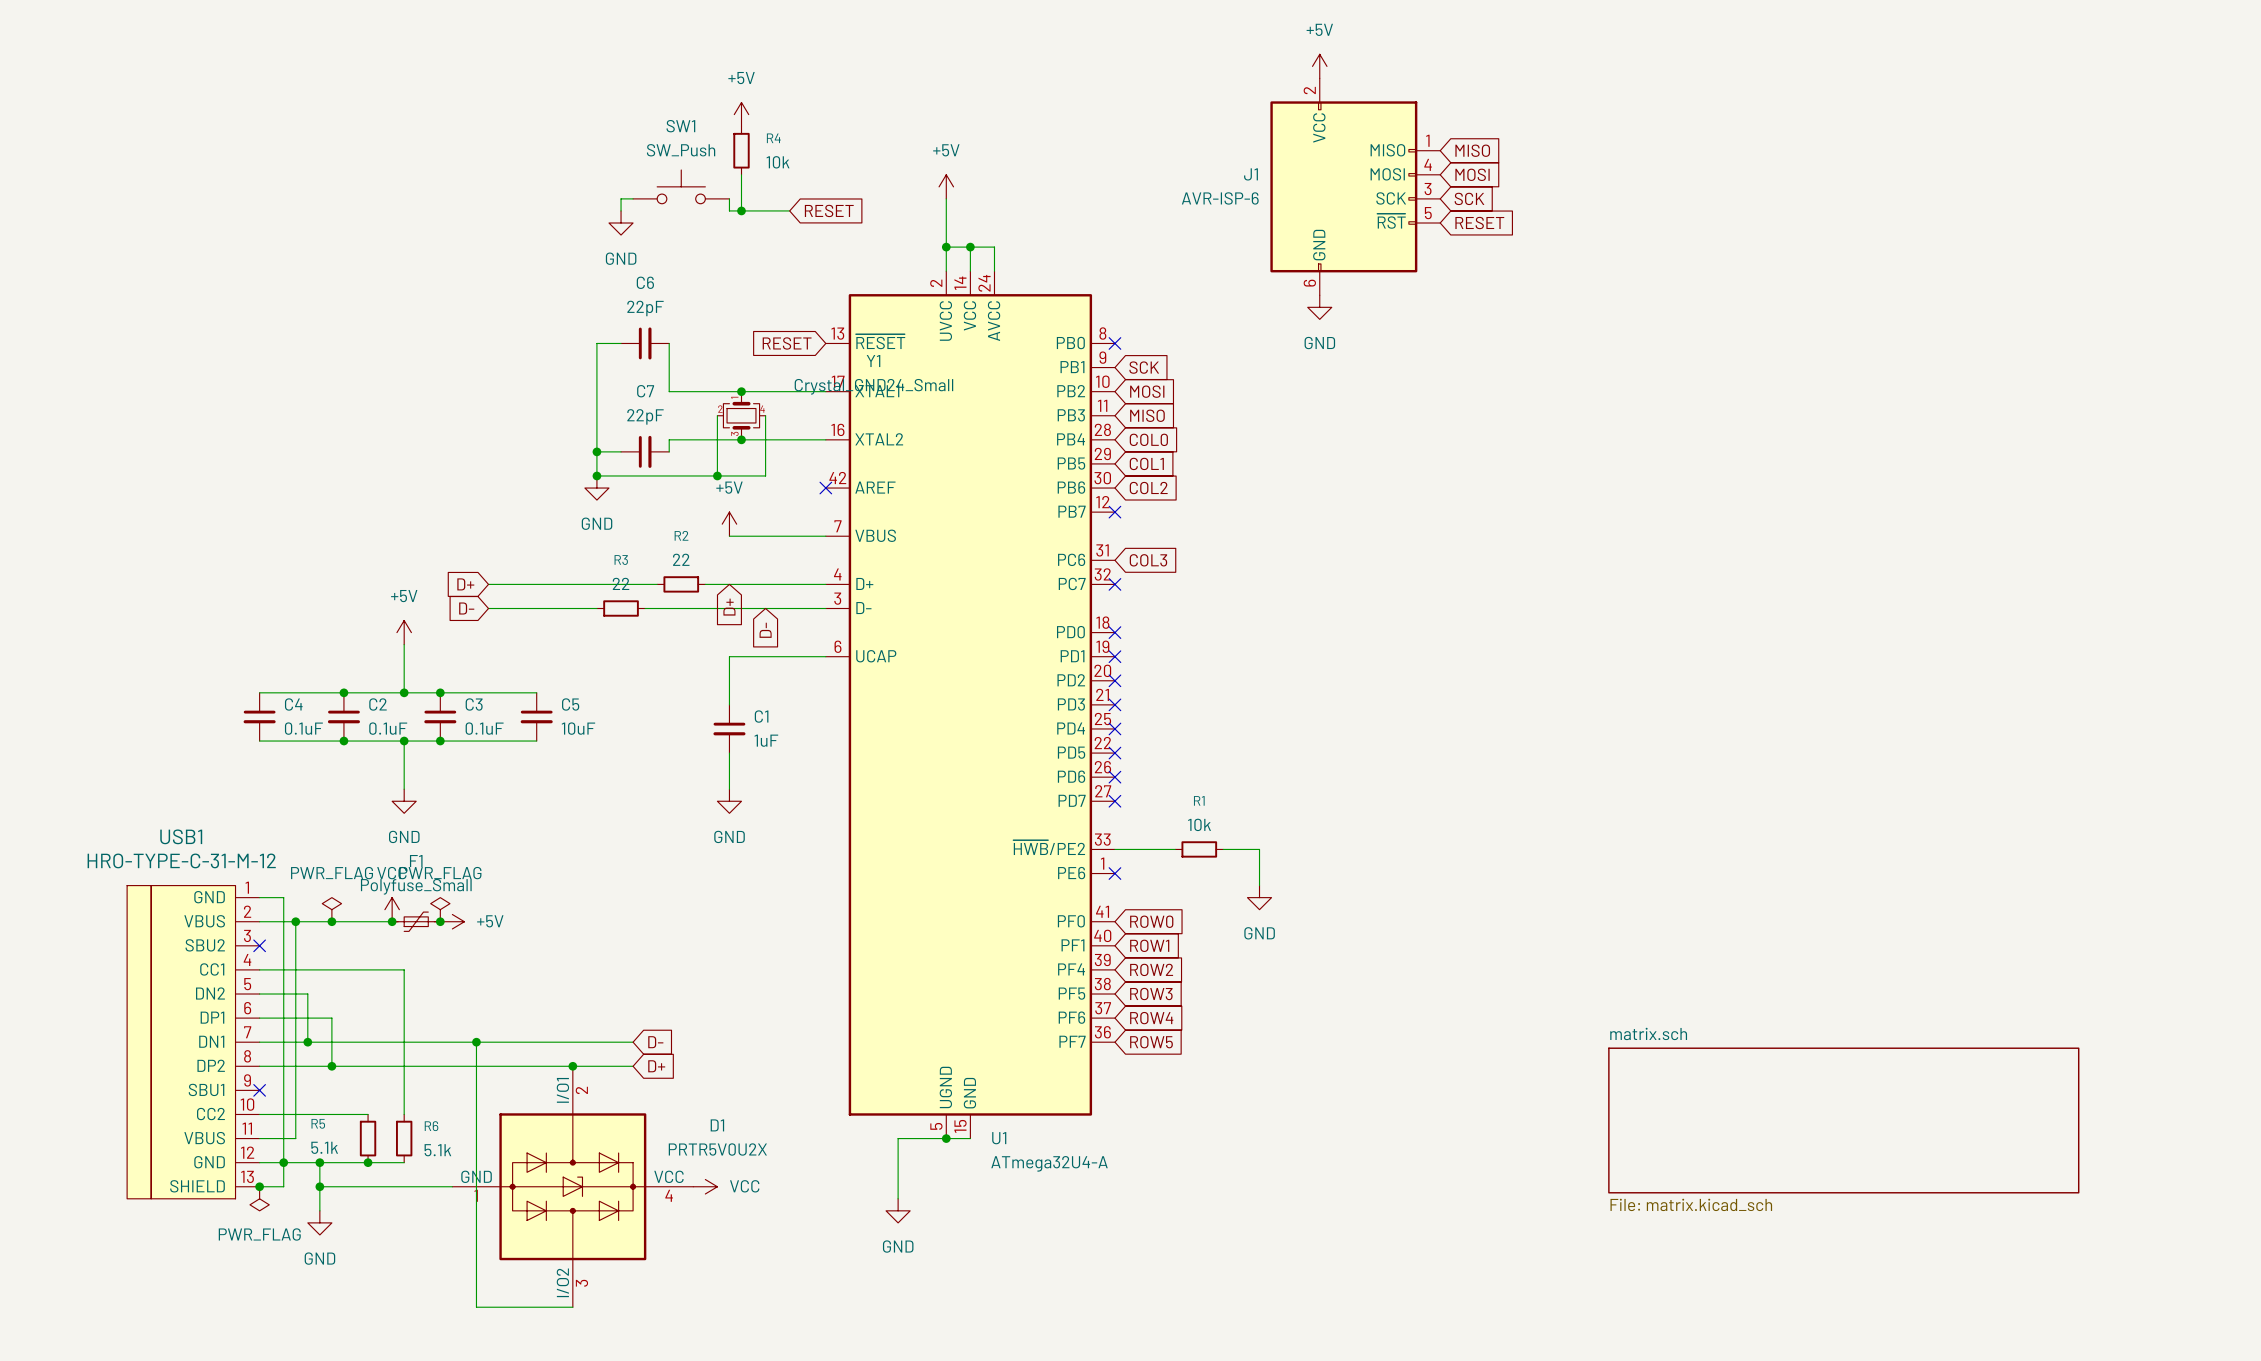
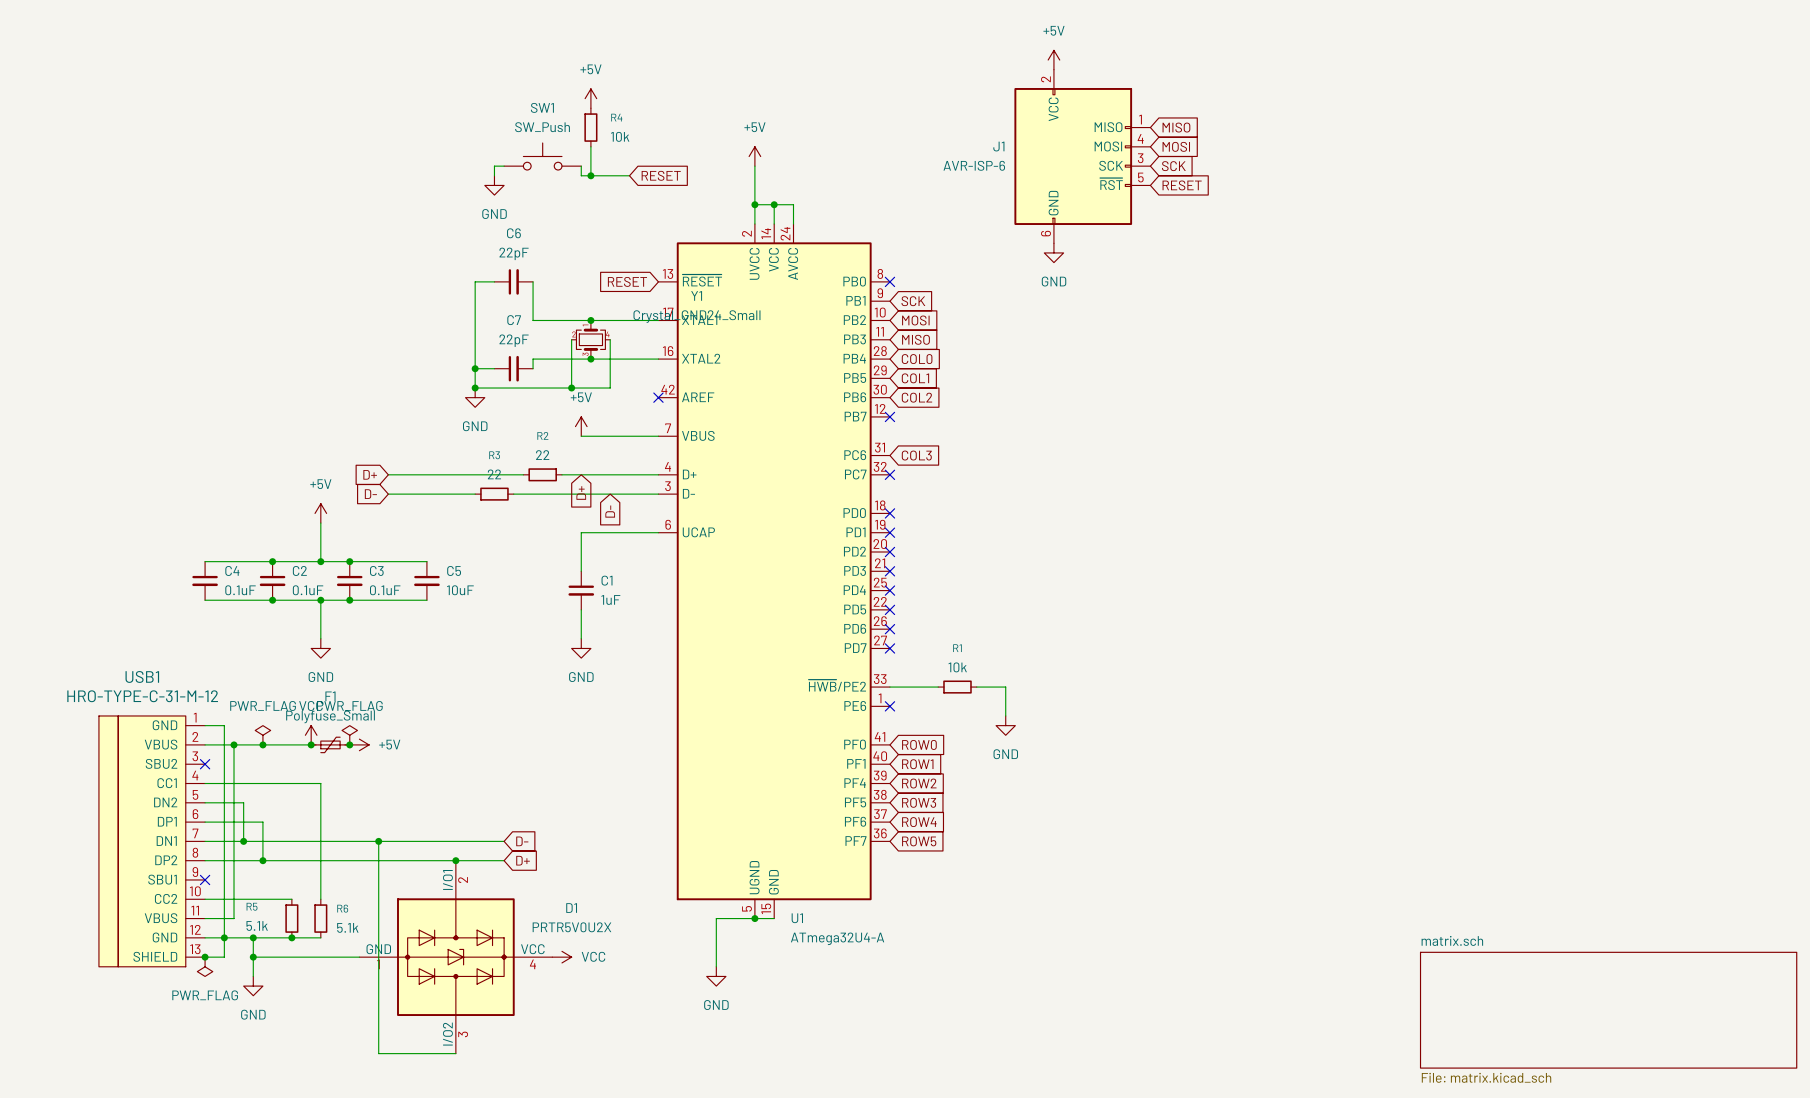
sheet matrix.sch position: (1843, 1120) -> (1608, 1010)

